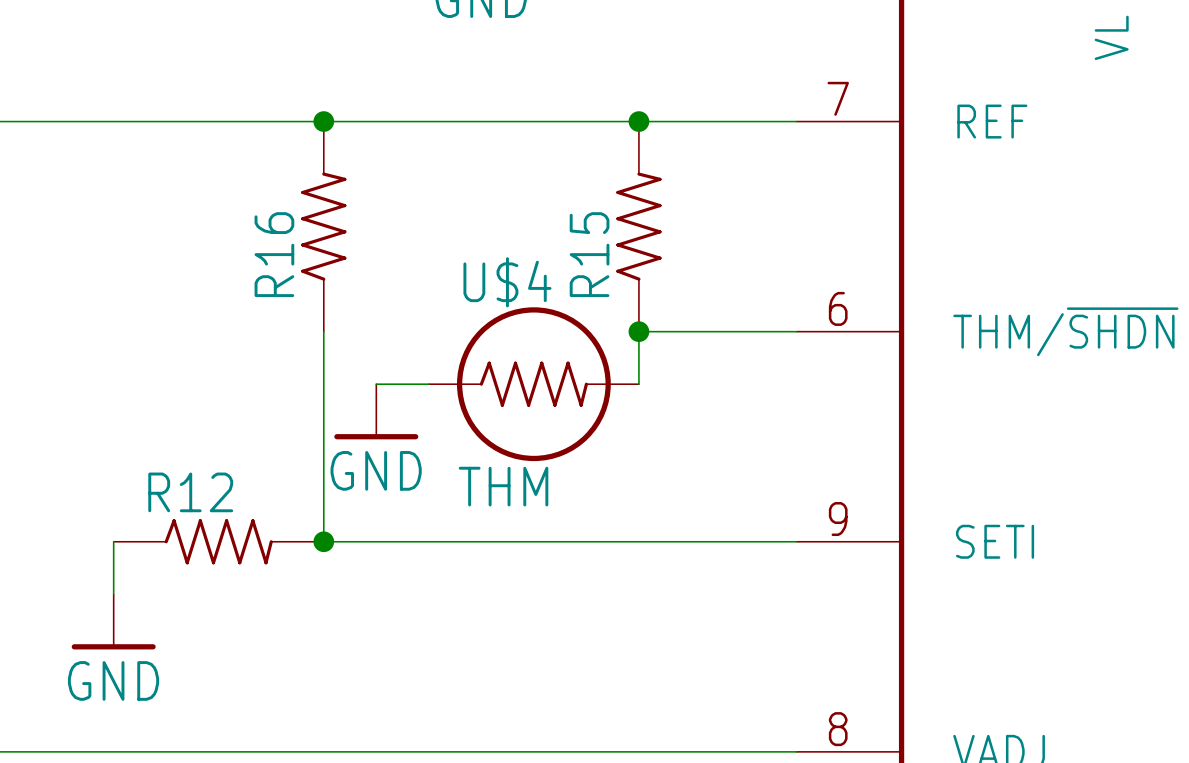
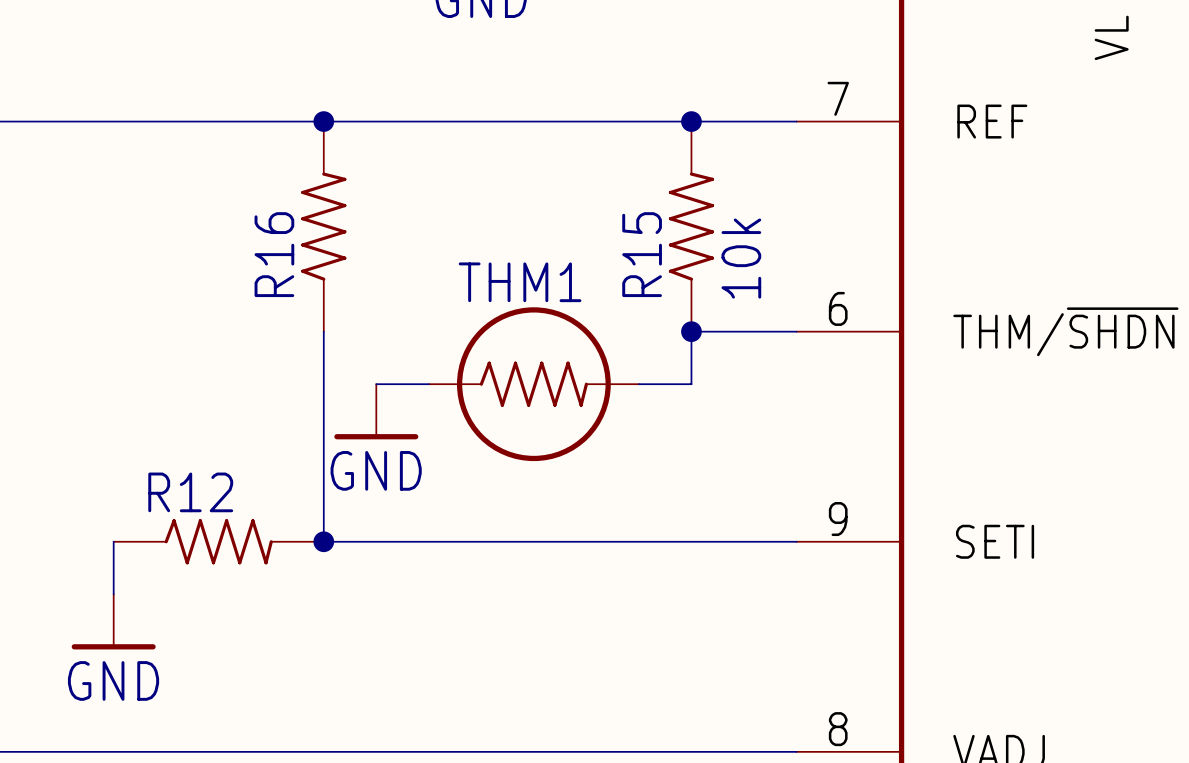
junction position: (638, 121) -> (691, 121)
R15 position: (638, 226) -> (691, 226)
R15 value: none -> 10k (741, 258)
U$4 name: U$4 (507, 282) -> THM1 (520, 282)
junction position: (638, 331) -> (691, 331)
wire: (691, 331) (638, 331) (638, 384) -> (691, 331) (691, 384) (638, 384)
U$4 value: THM (503, 486) -> none

